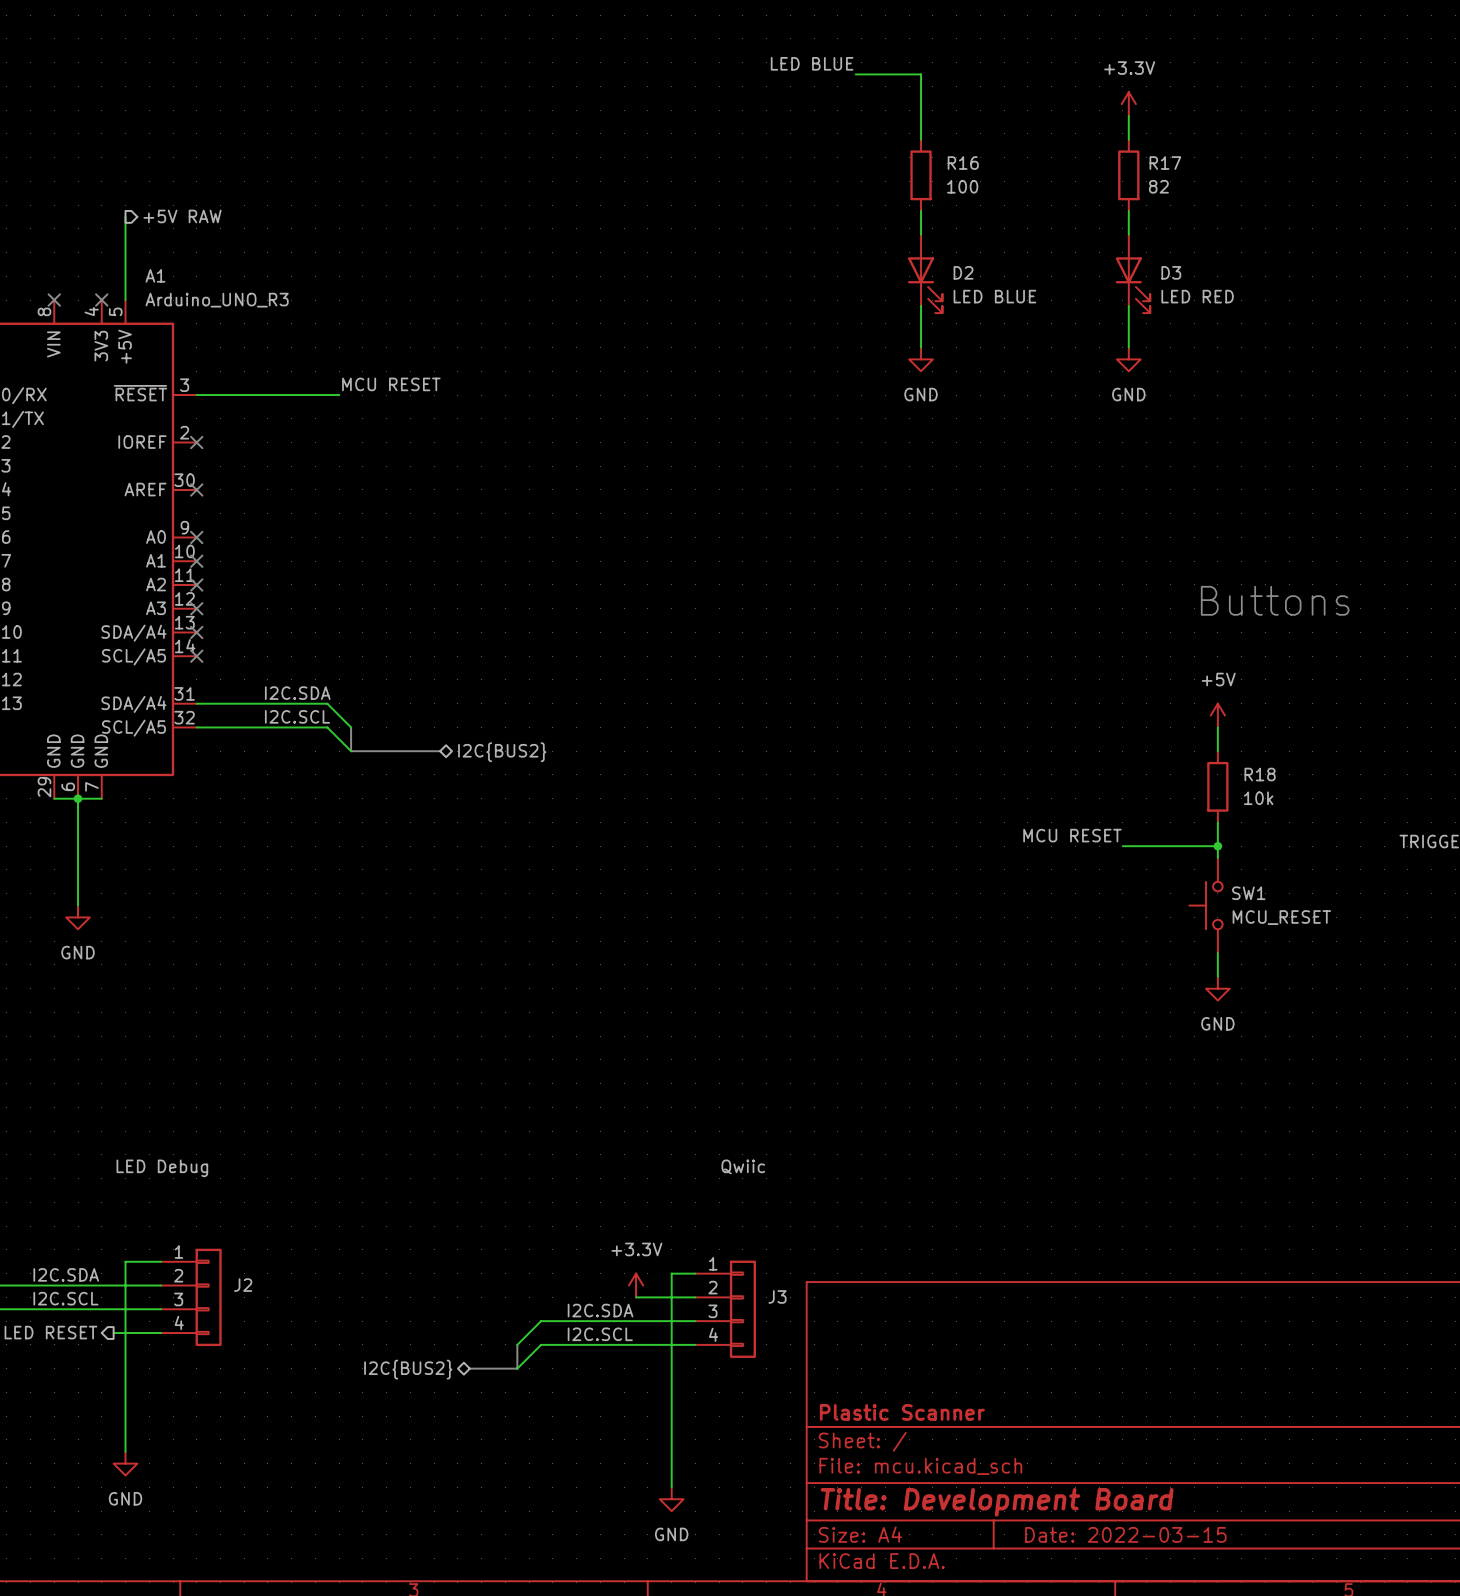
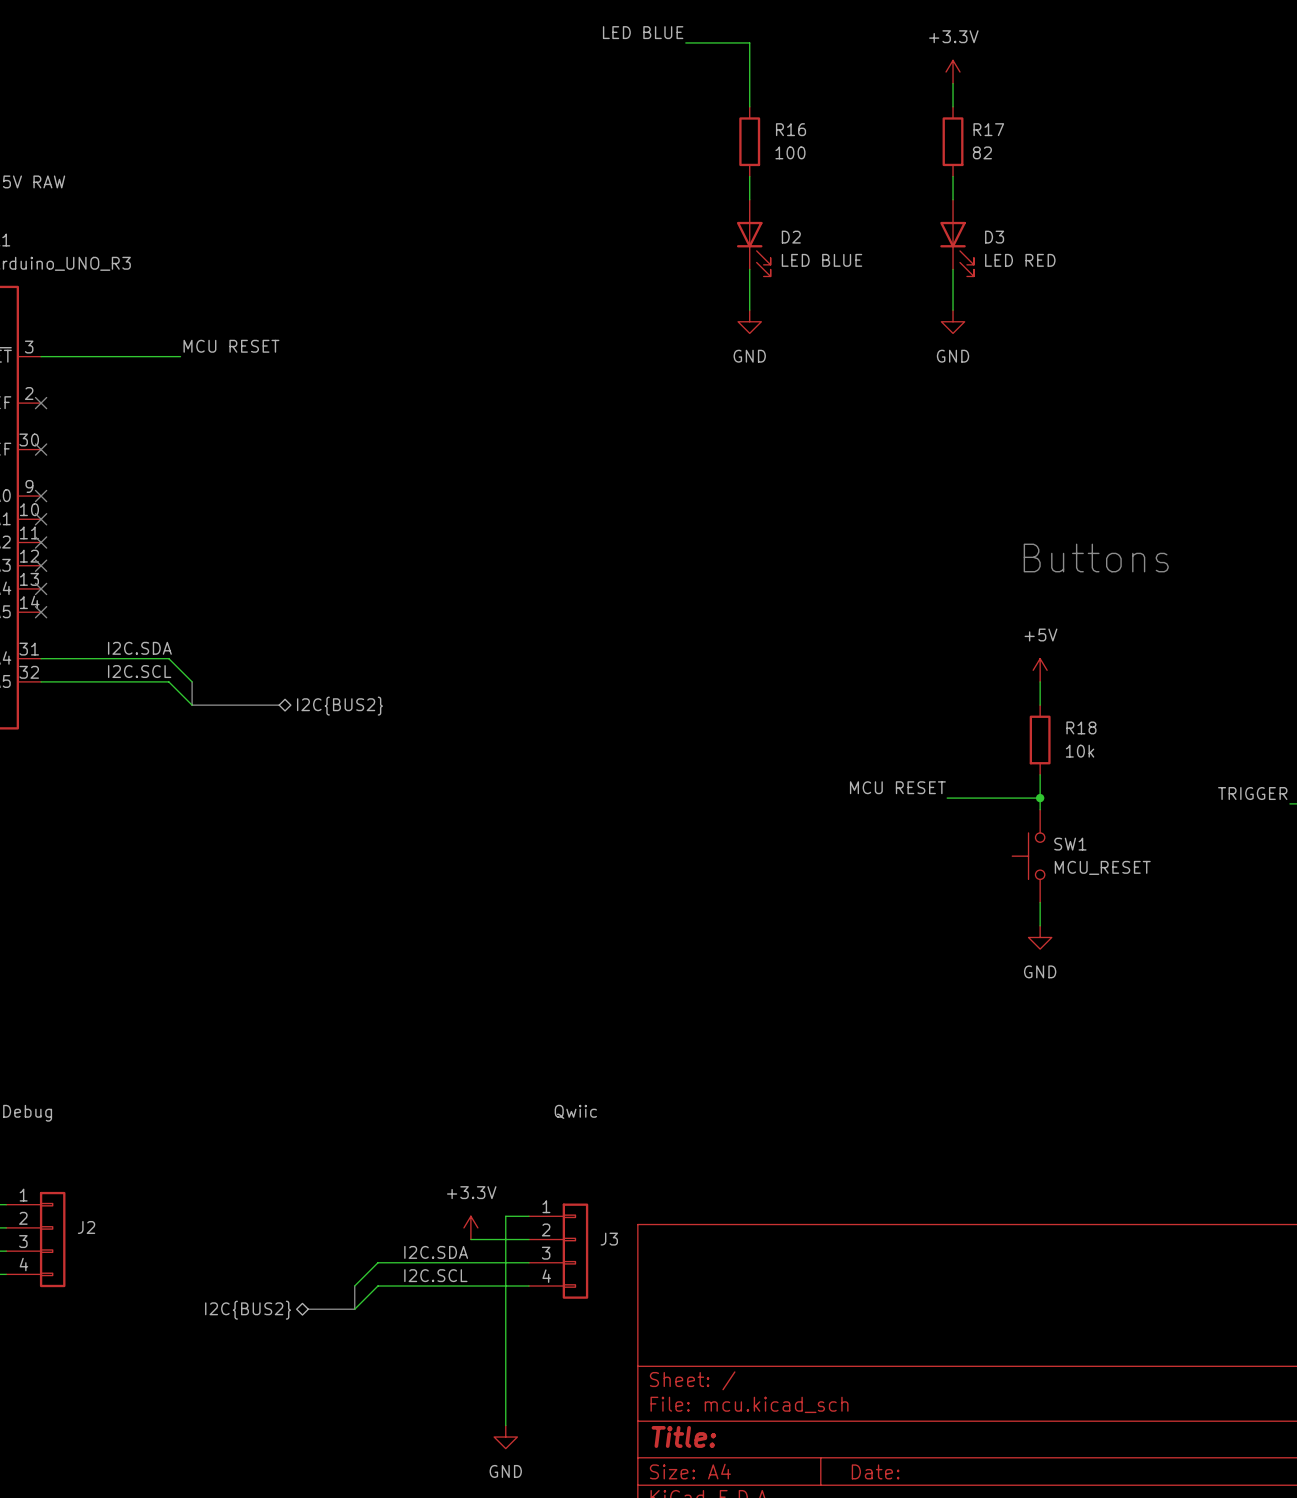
title block: Plastic Scanner (902, 1412) -> none
title block: Title: Development Board (997, 1502) -> Title: (683, 1436)
title block: Date: 2022-03-15 (1125, 1534) -> Date: (875, 1471)

